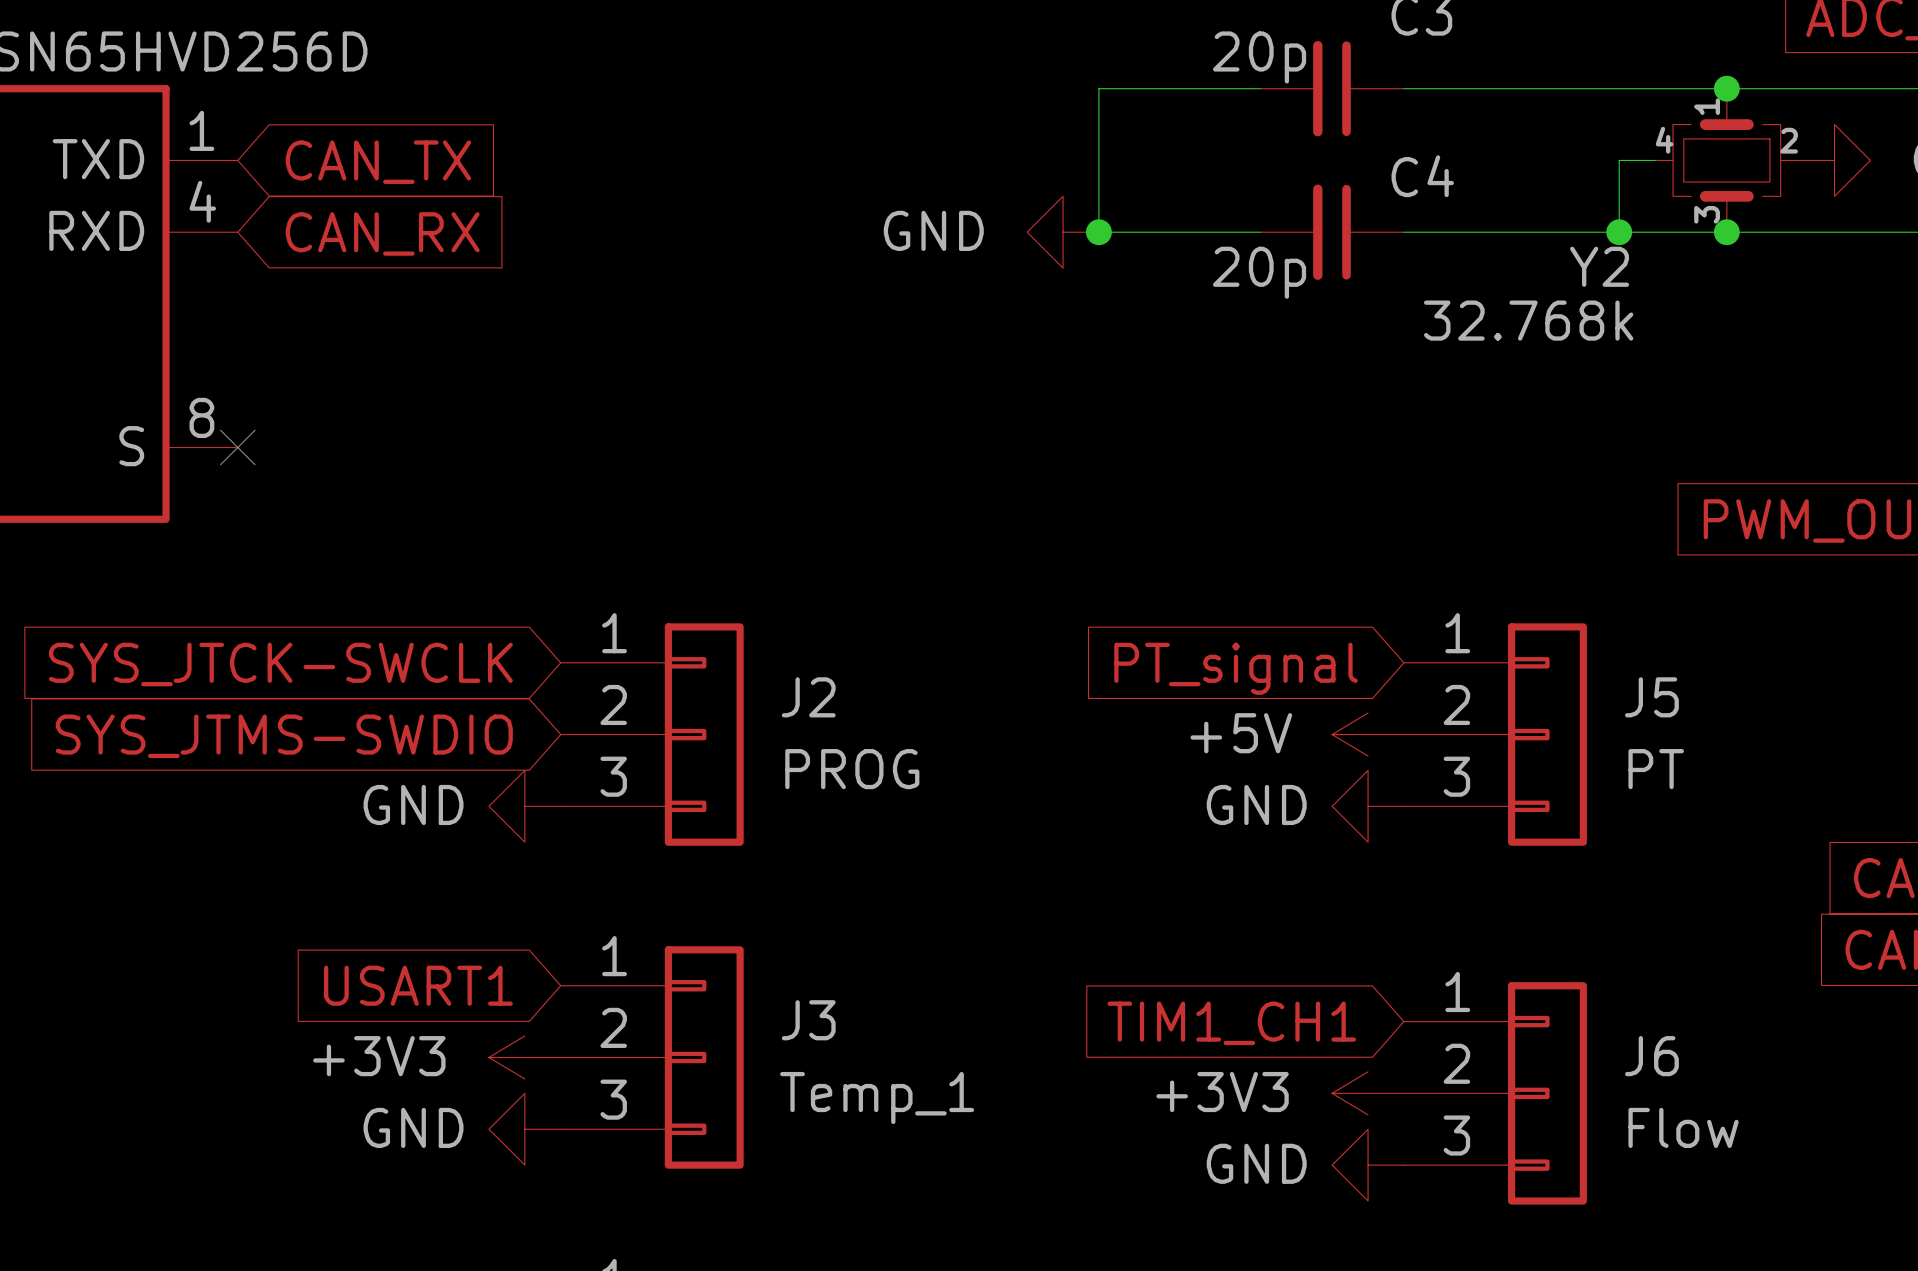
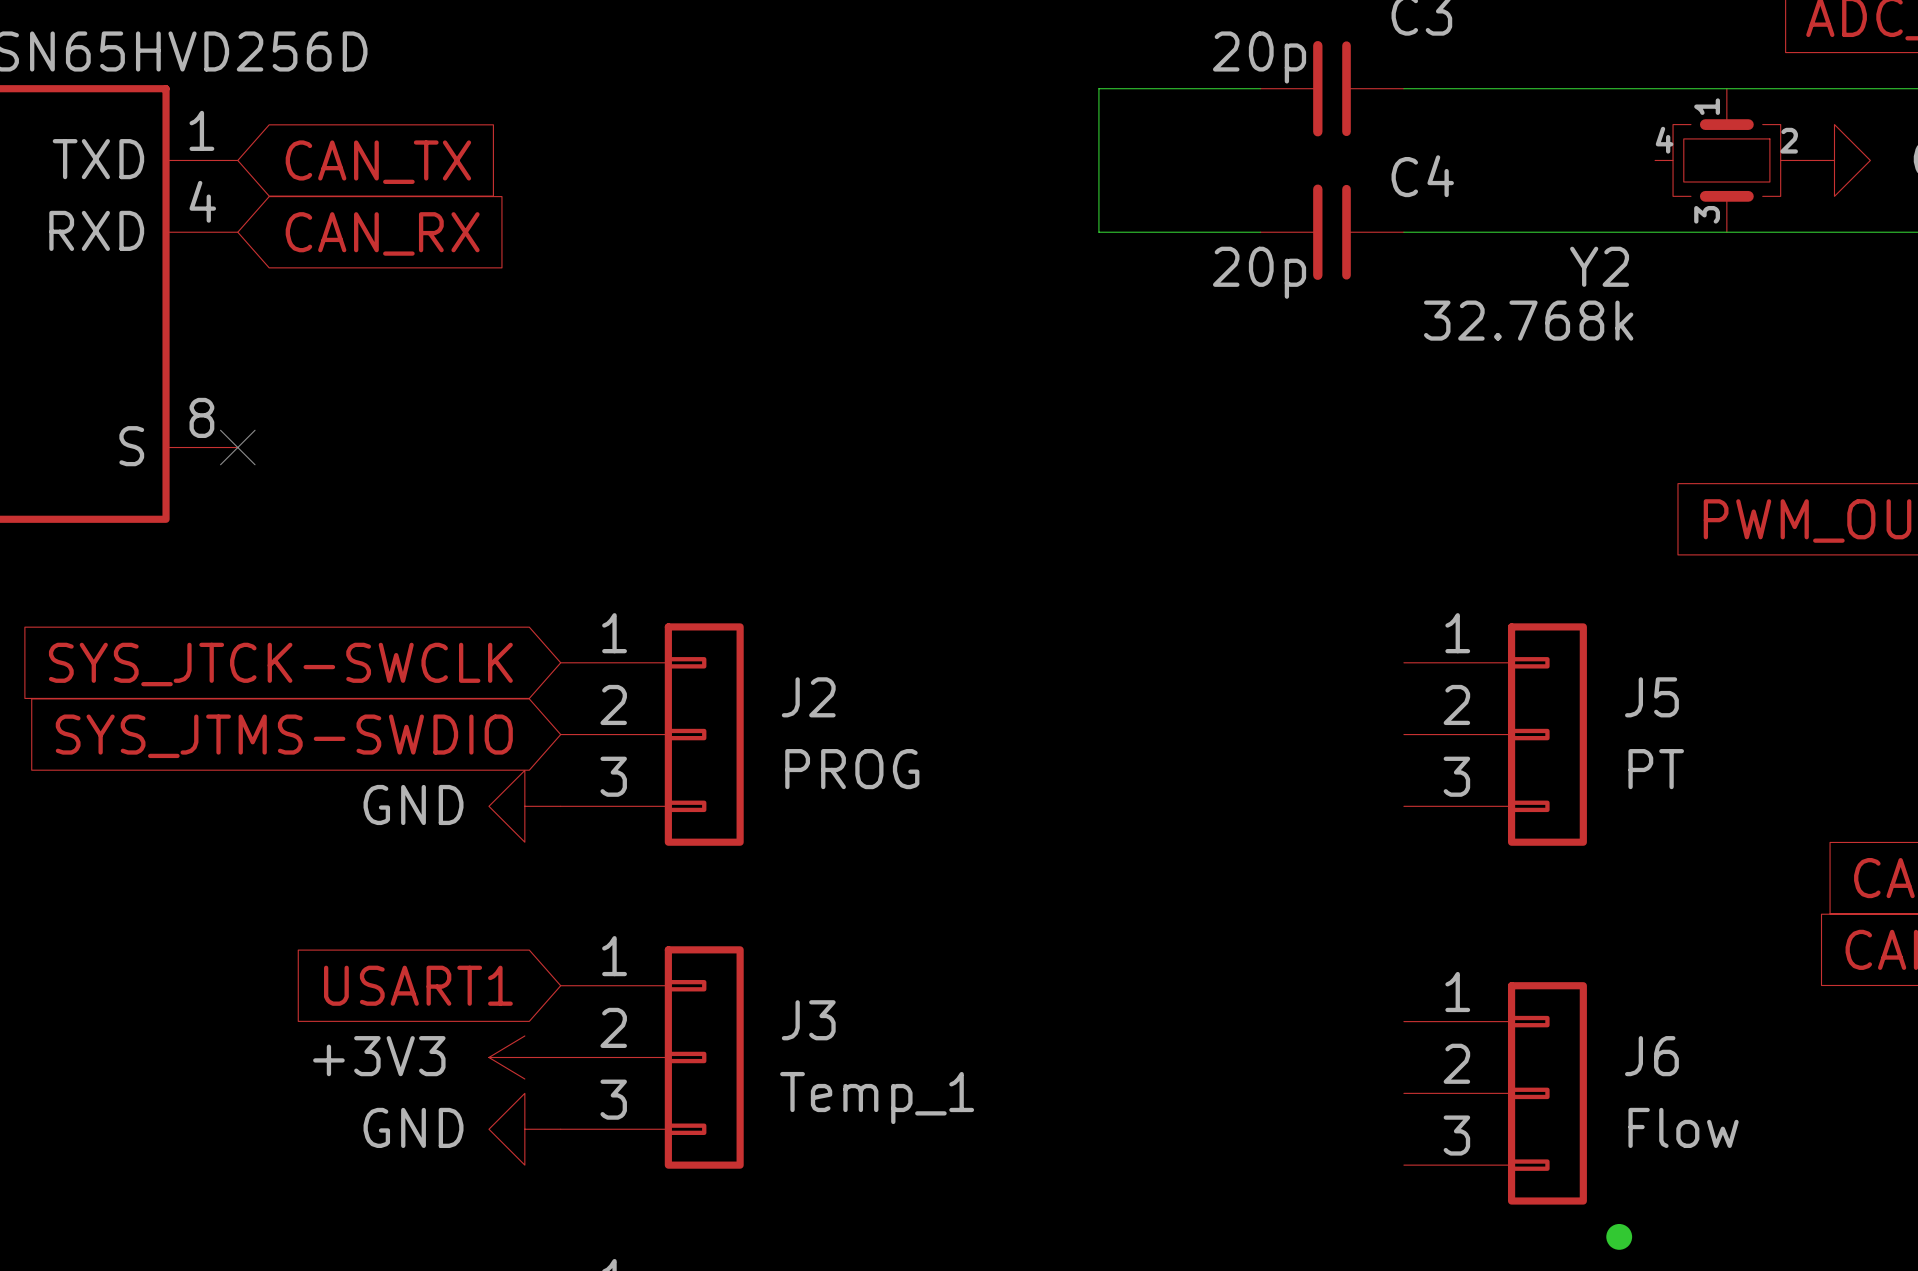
junction: (1726, 88) -> none
wire: (1655, 160) (1619, 160) (1619, 232) -> none
power symbol: GND (1063, 232) -> none
junction: (1098, 232) -> none
junction: (1619, 232) -> none
junction: (1726, 232) -> none
global label: PT_signal (1236, 668) -> none
power symbol: +5V (1368, 734) -> none
power symbol: GND (1368, 806) -> none
global label: TIM1_CH1 (1231, 1023) -> none
power symbol: +3V3 (1368, 1093) -> none
power symbol: GND (1368, 1165) -> none
junction: none -> (1619, 1236)

